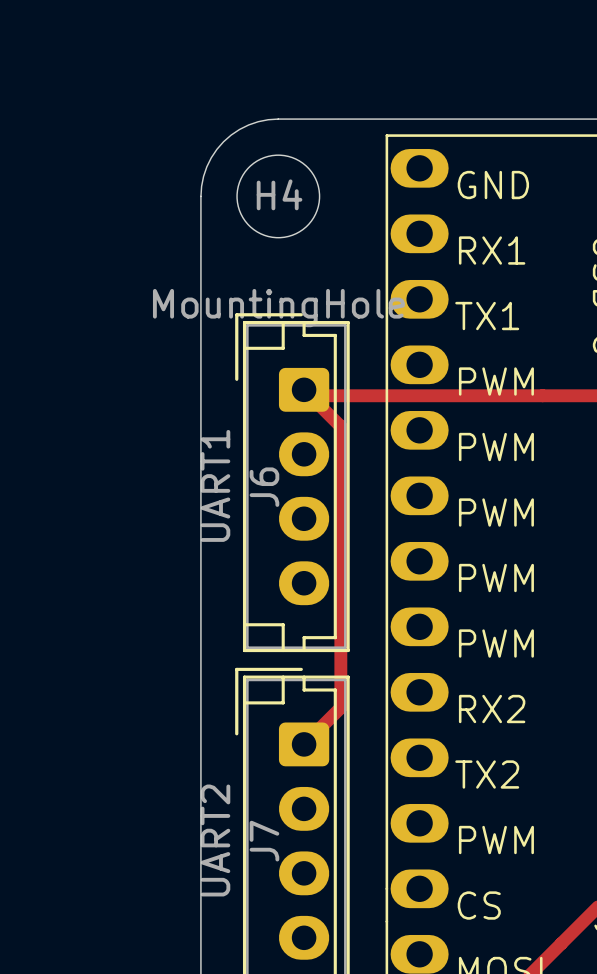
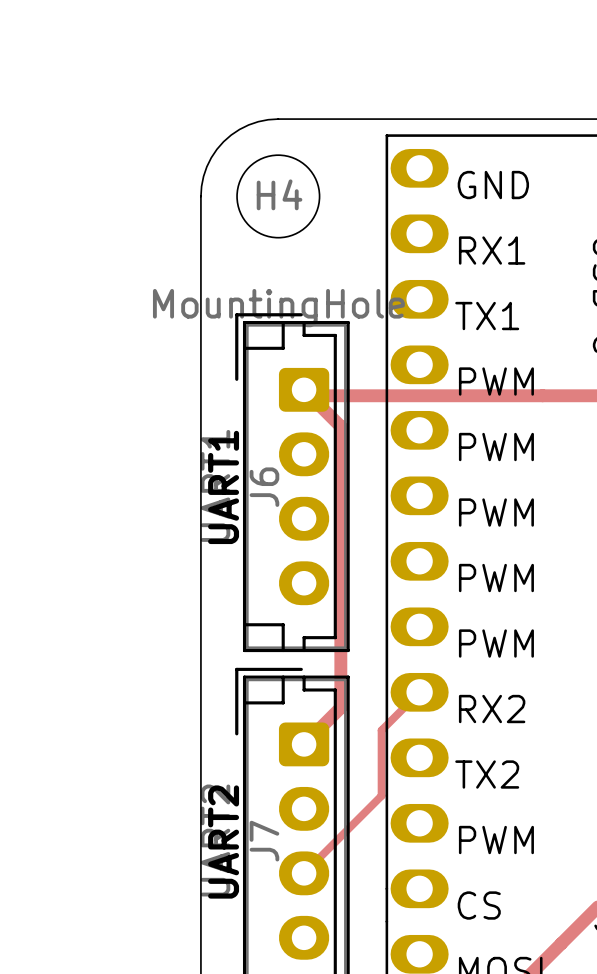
text: none -> UART1 (223, 487)
track: none -> (419, 692) (381, 730) (381, 795) (304, 873)
text: none -> UART2 (223, 842)

